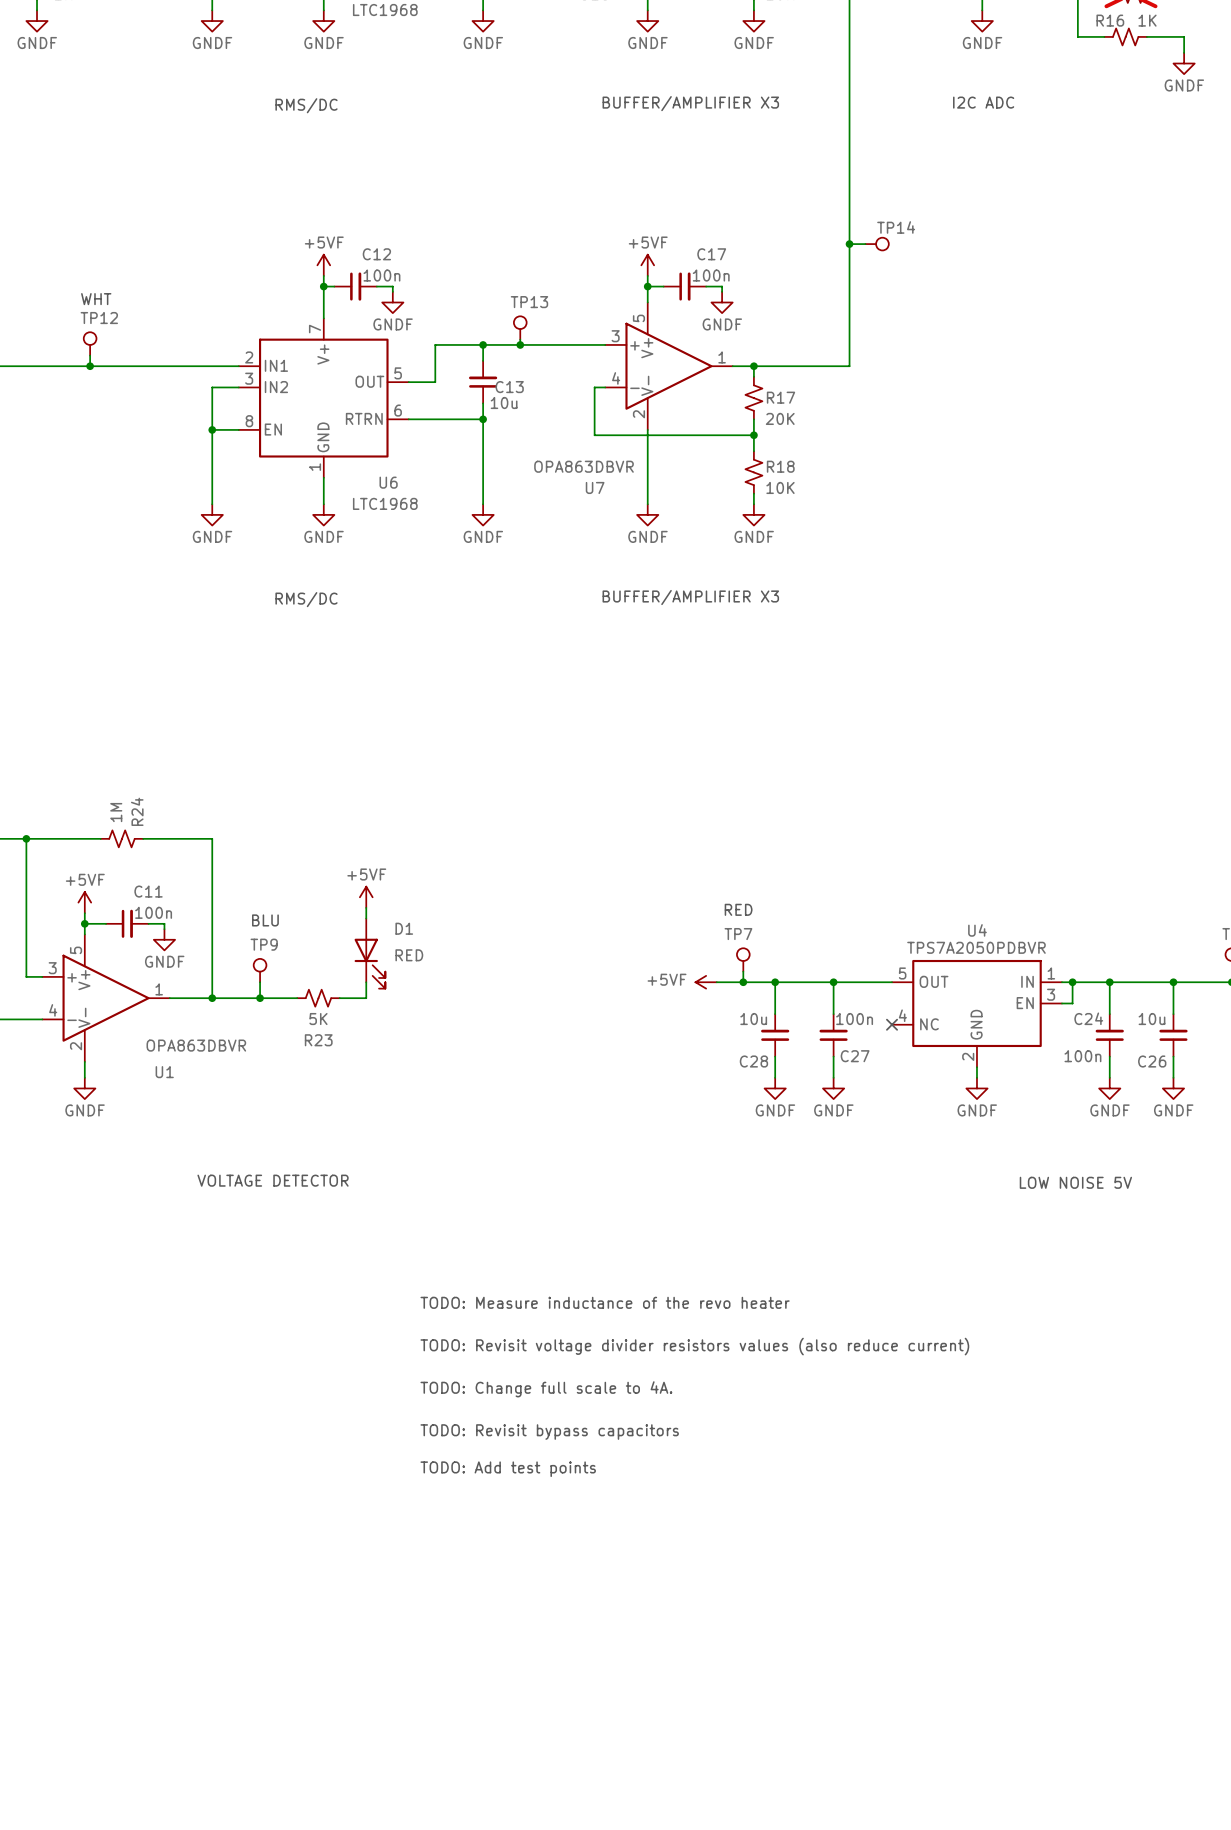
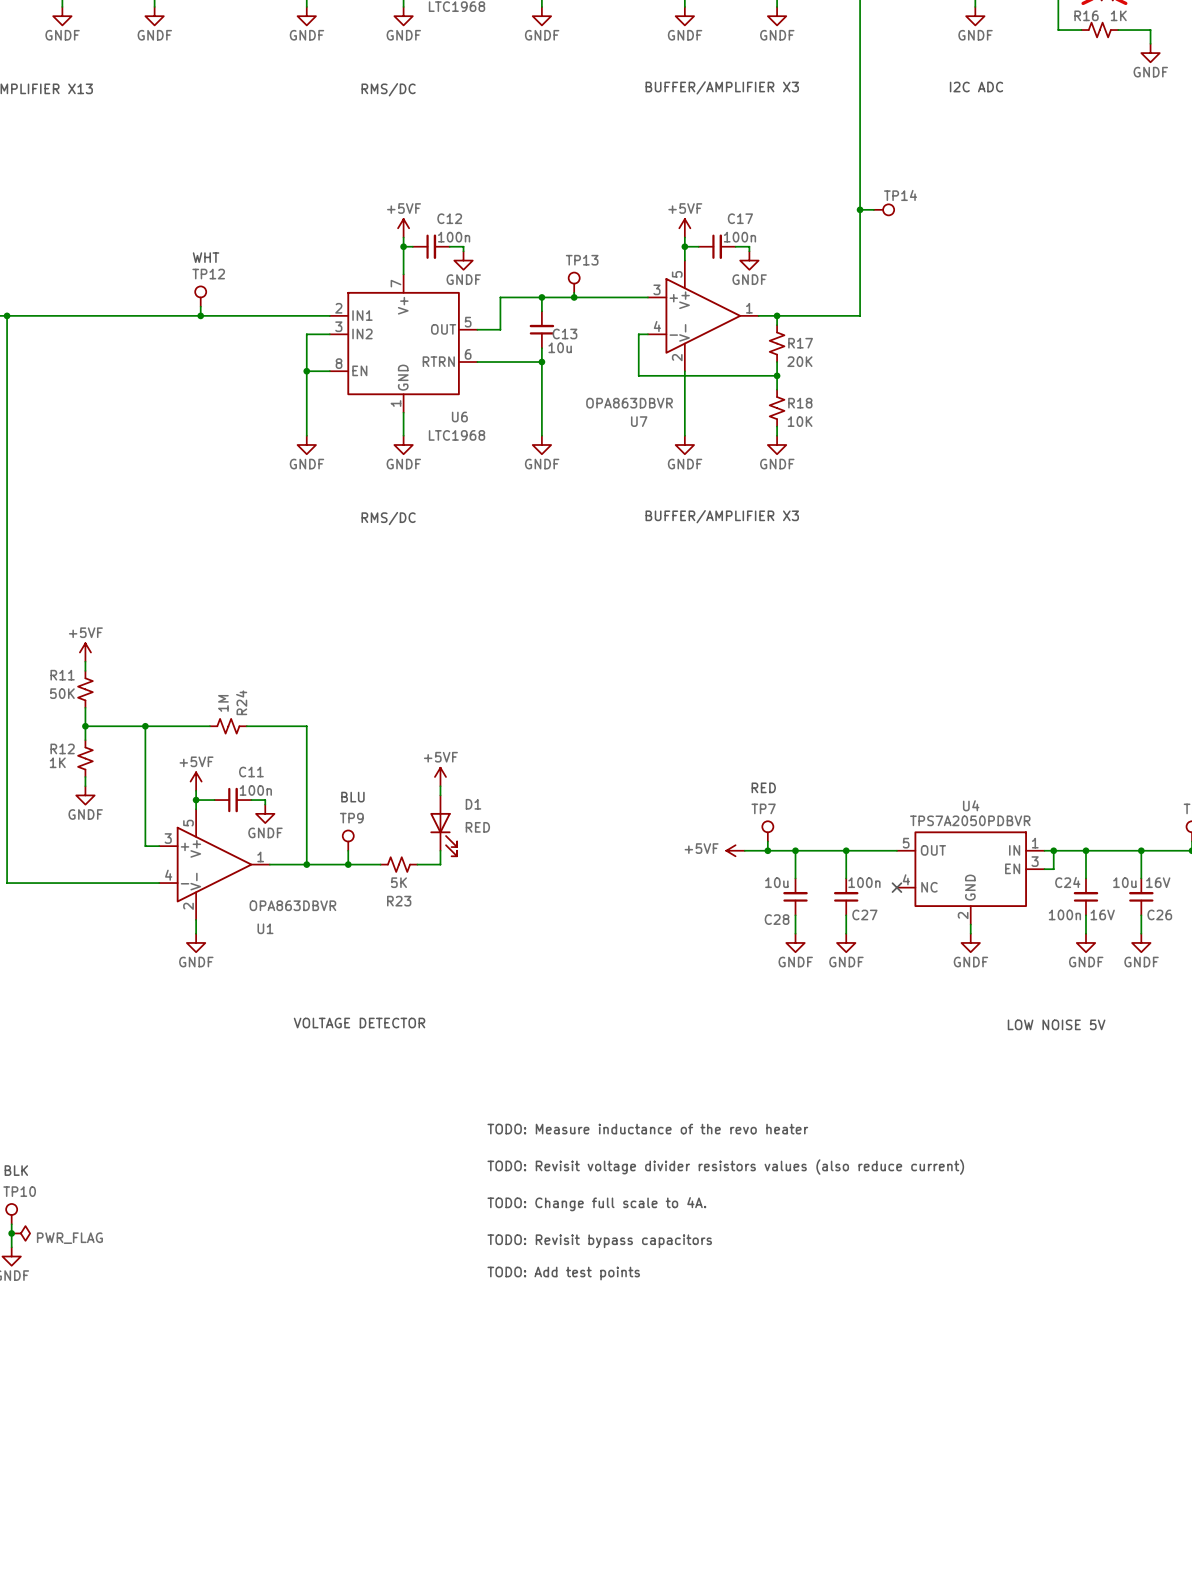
C26 value: 10u (1151, 1019) -> 10u 16V (1141, 882)
C24 value: 100n (1082, 1056) -> 100n 16V (1081, 914)
C26 name position: C26 (1152, 1061) -> C26 (1159, 914)

